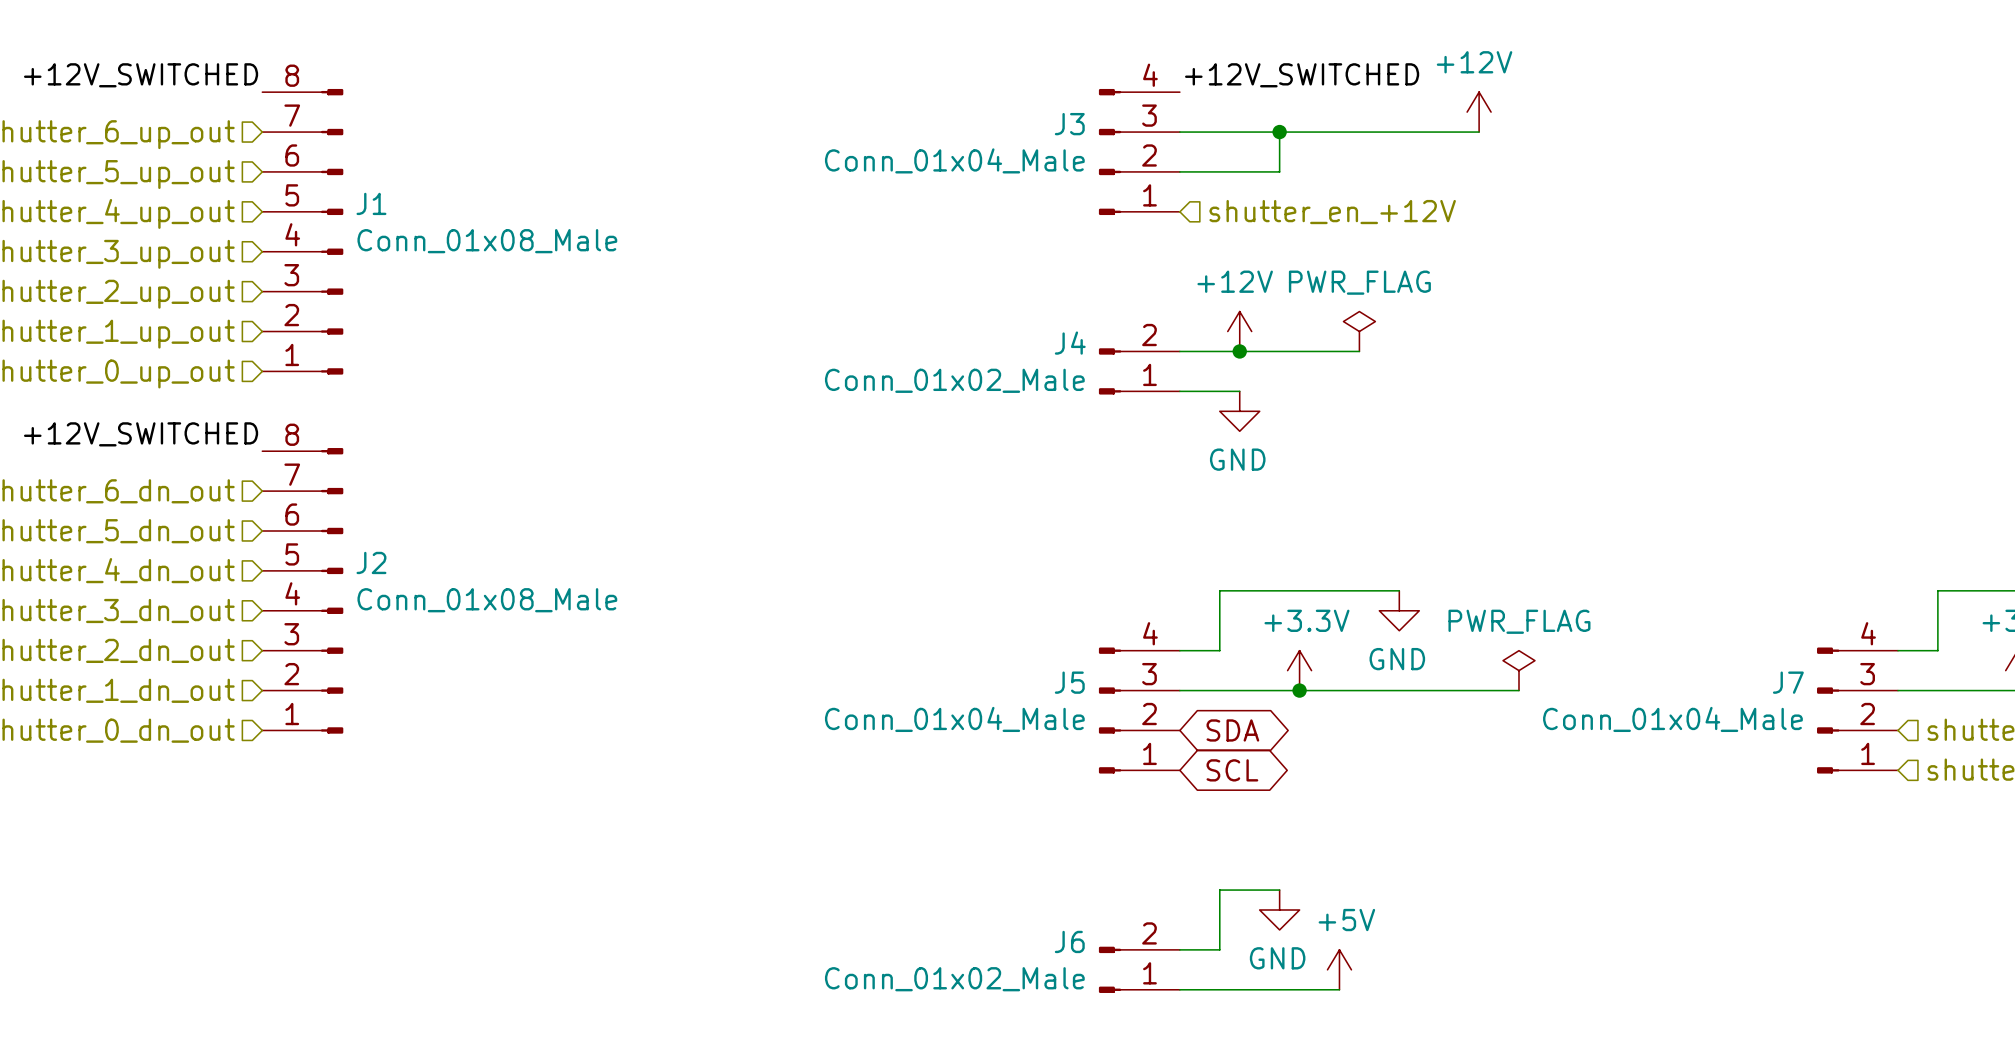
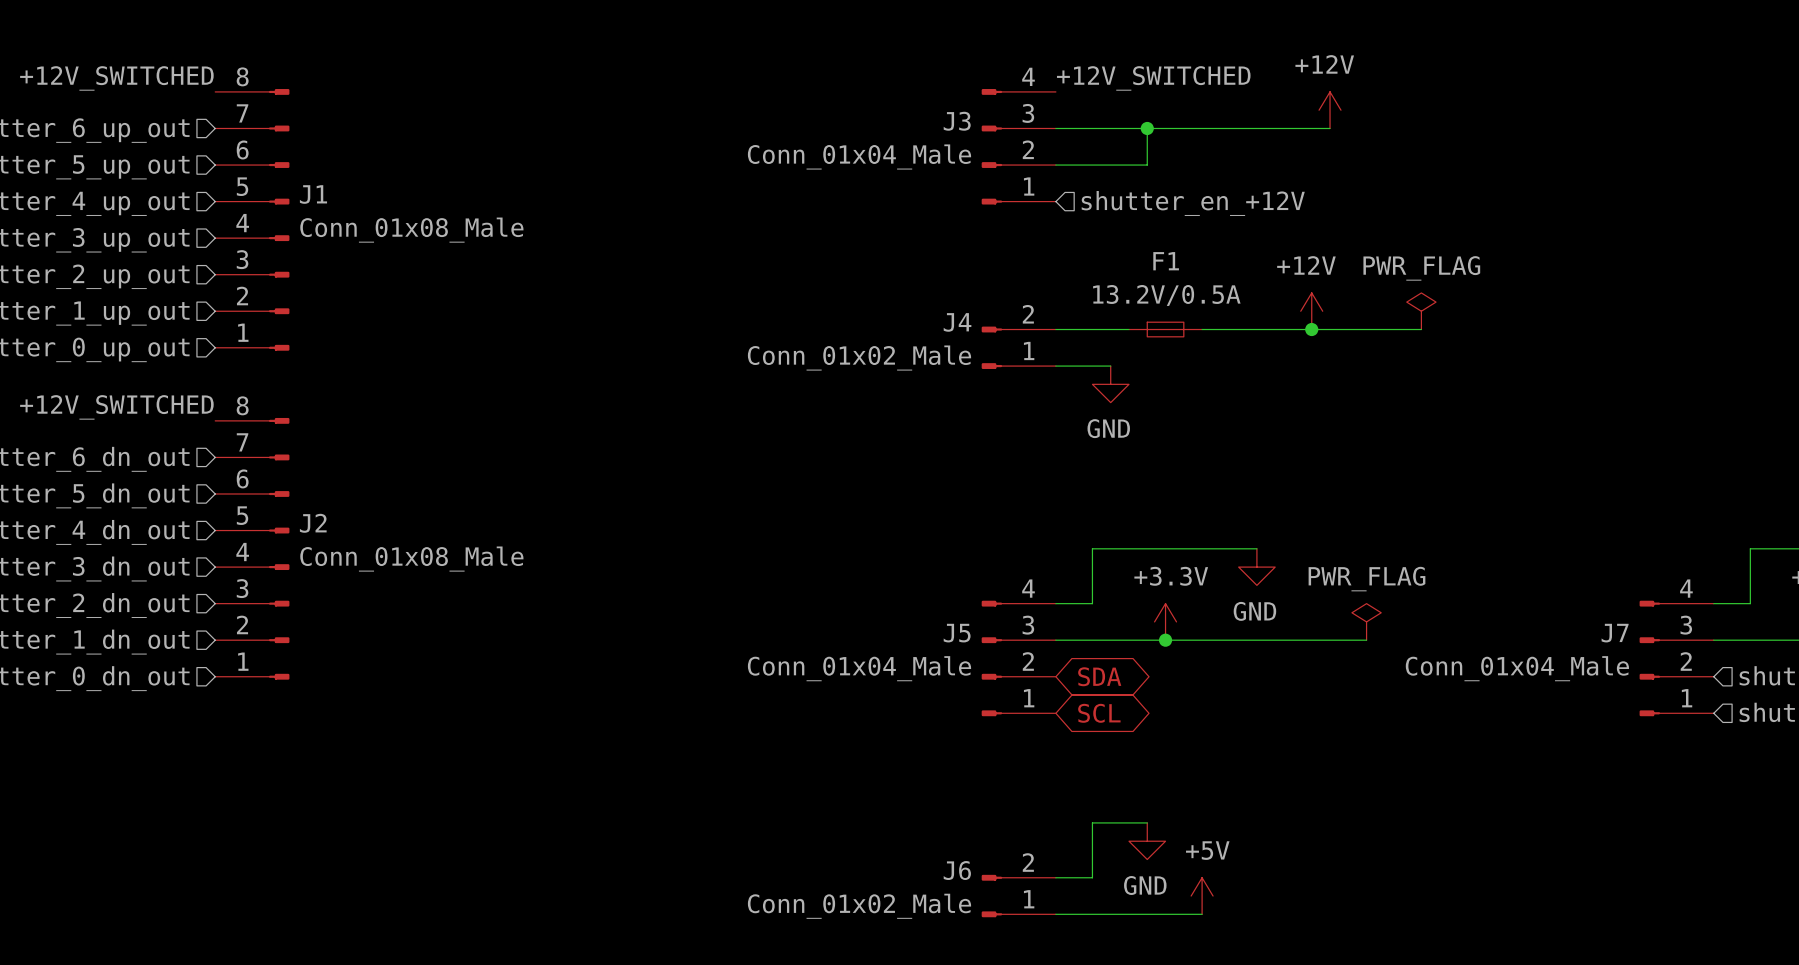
power symbol position: +12V (1239, 331) -> +12V (1311, 311)
power symbol position: PWR_FLAG (1359, 331) -> PWR_FLAG (1421, 311)
junction: (1239, 351) -> none
F1: none -> 13.2V/0.5A (1165, 329)
wire: none -> (1220, 329) (1421, 329)
junction: none -> (1311, 329)

